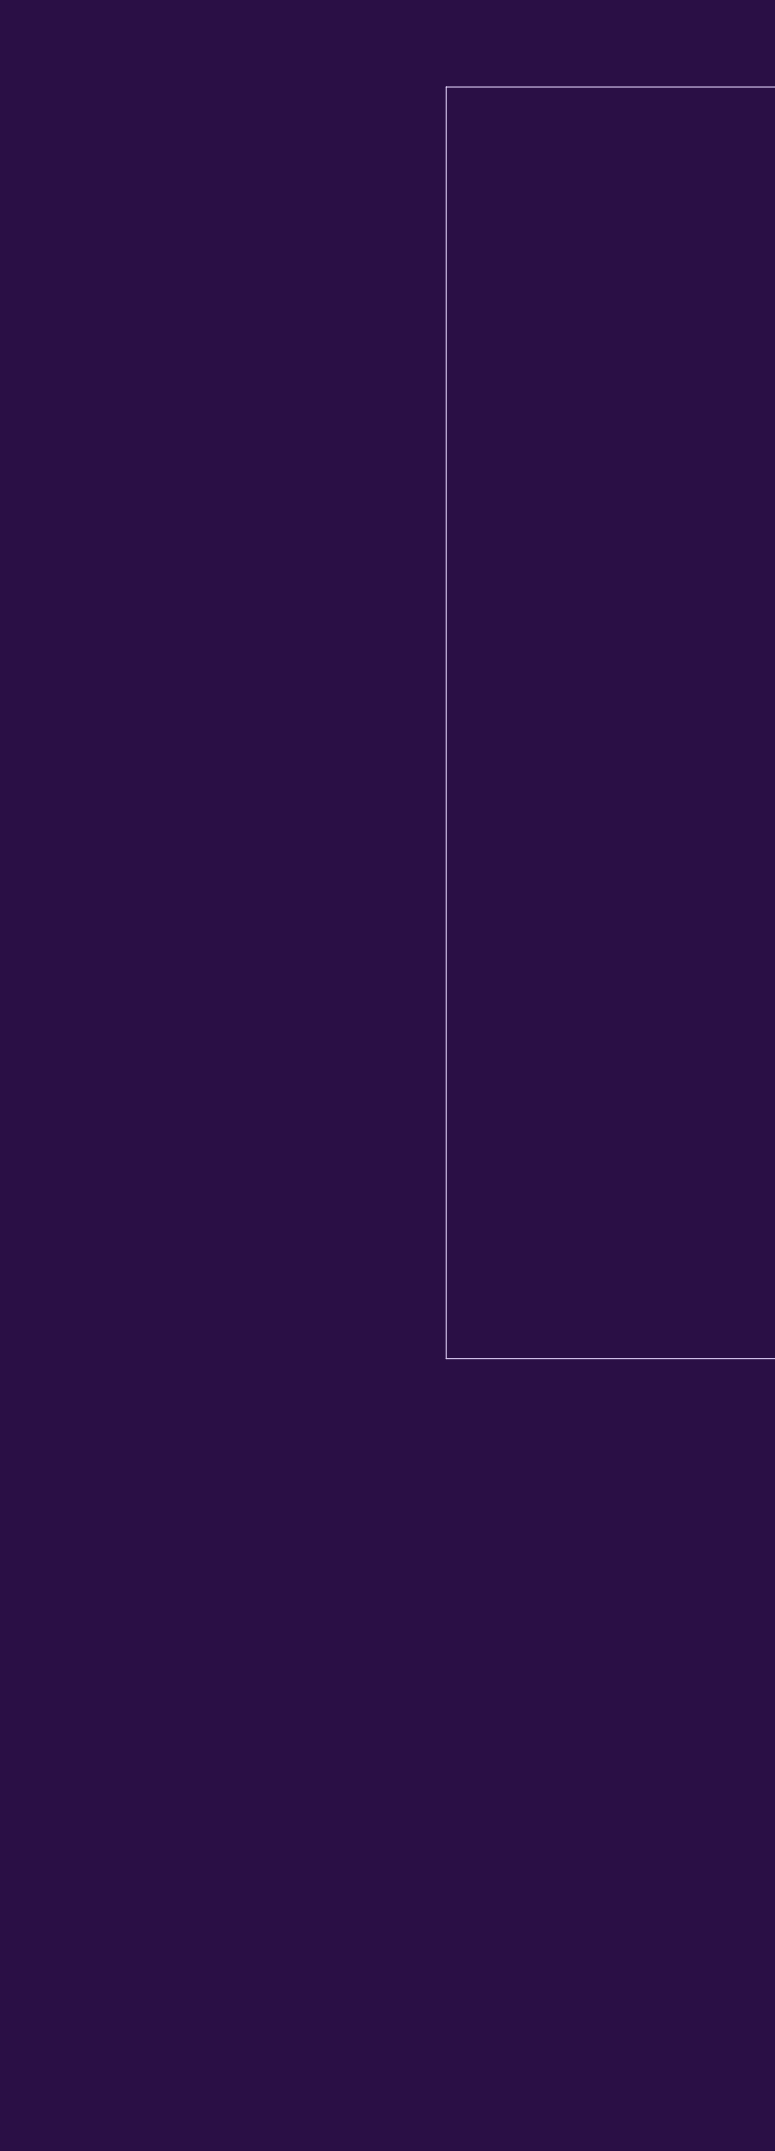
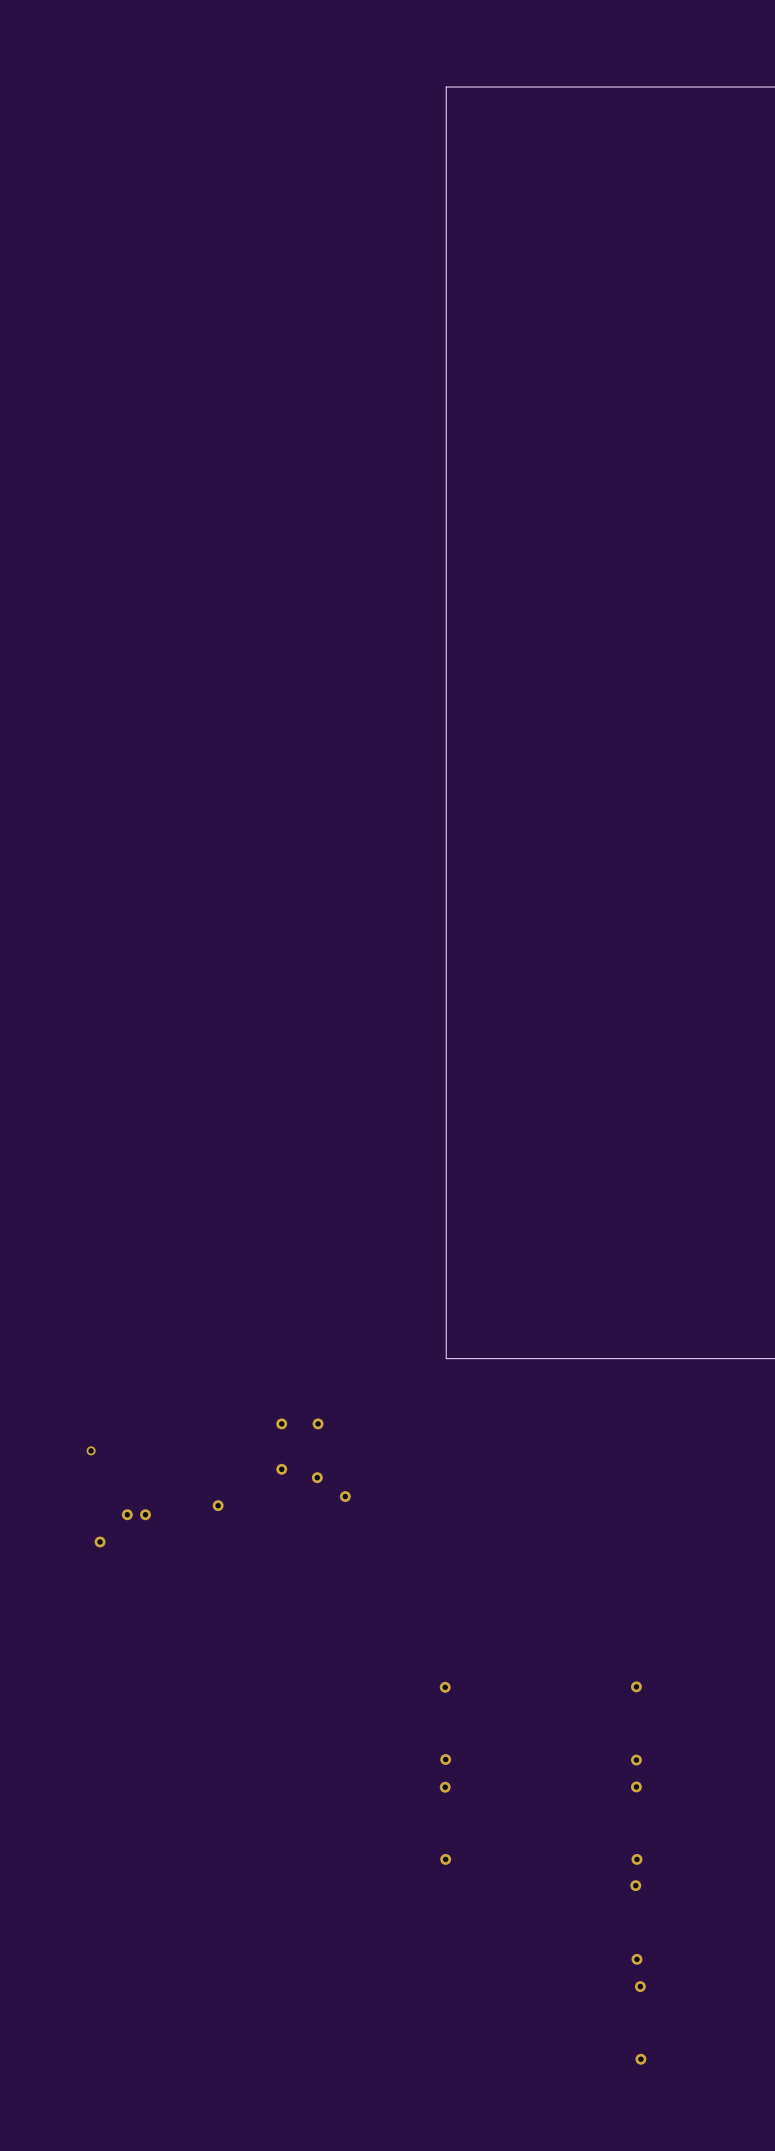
via: none -> (281, 1423)
via: none -> (318, 1423)
via: none -> (91, 1450)
via: none -> (281, 1469)
via: none -> (317, 1477)
via: none -> (345, 1496)
via: none -> (218, 1505)
via: none -> (127, 1514)
via: none -> (145, 1514)
via: none -> (100, 1541)
via: none -> (636, 1686)
via: none -> (445, 1687)
via: none -> (445, 1759)
via: none -> (636, 1760)
via: none -> (636, 1786)
via: none -> (445, 1787)
via: none -> (445, 1859)
via: none -> (636, 1859)
via: none -> (635, 1885)
via: none -> (636, 1959)
via: none -> (640, 1986)
via: none -> (640, 2059)

